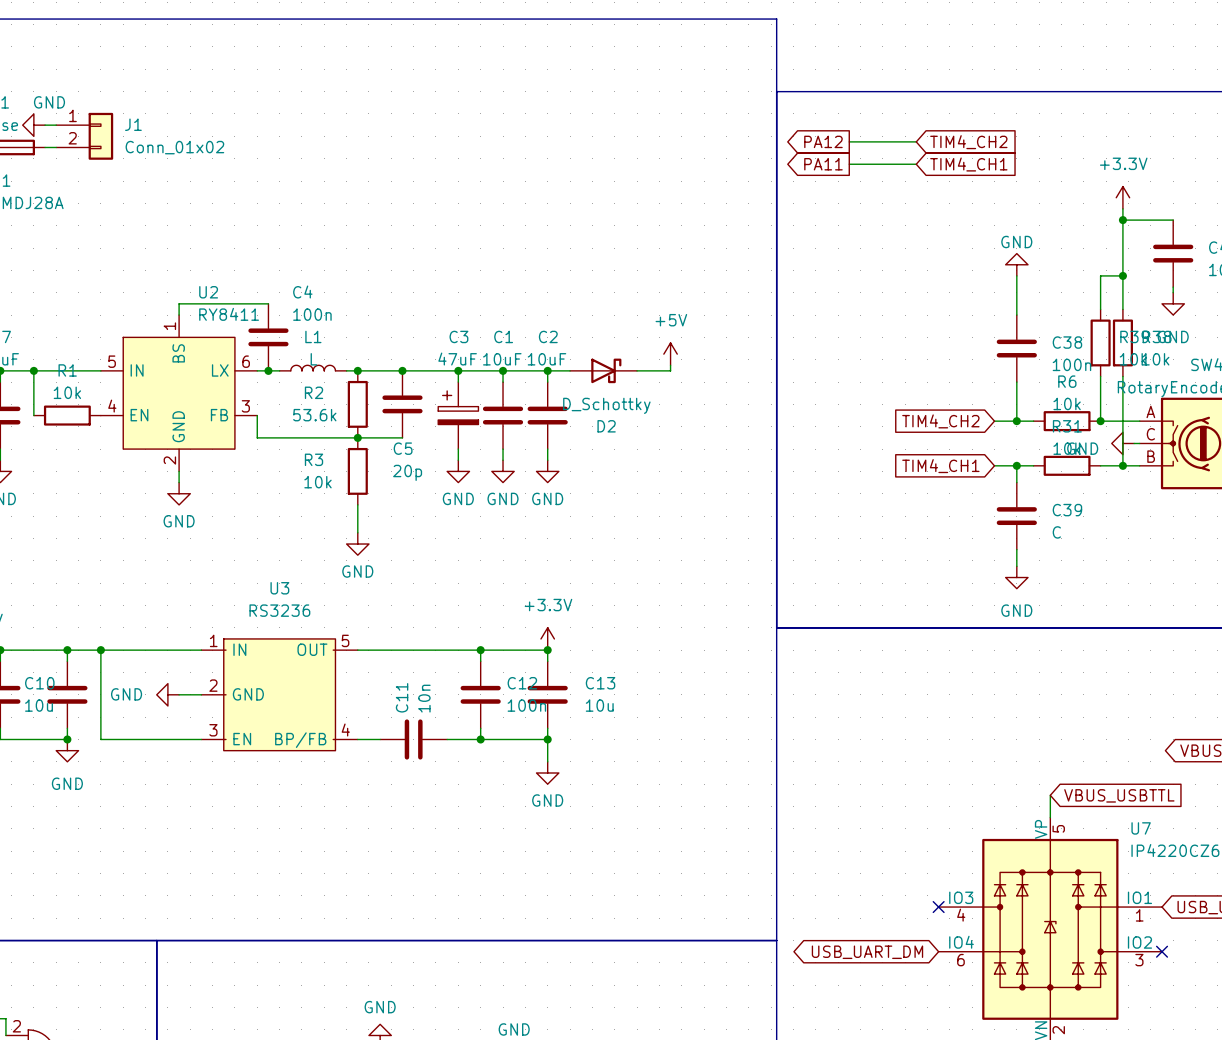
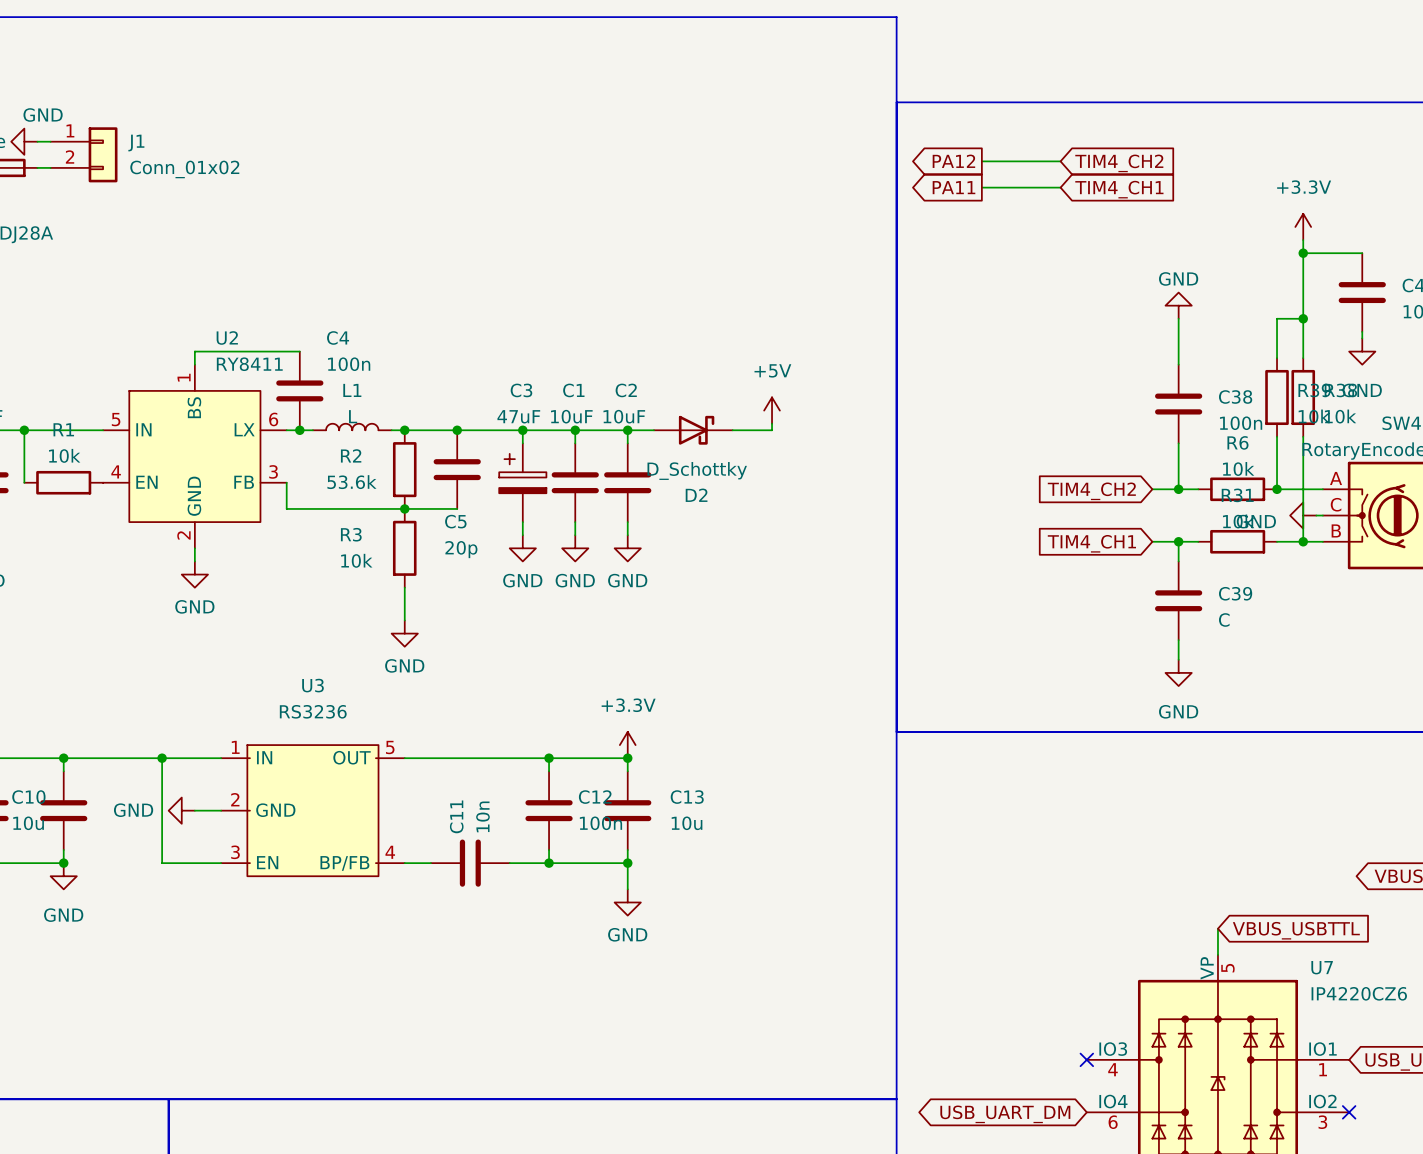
wire: (100, 650) (100, 739) (151, 739) -> (162, 758) (162, 863)
junction position: (100, 650) -> (162, 758)

